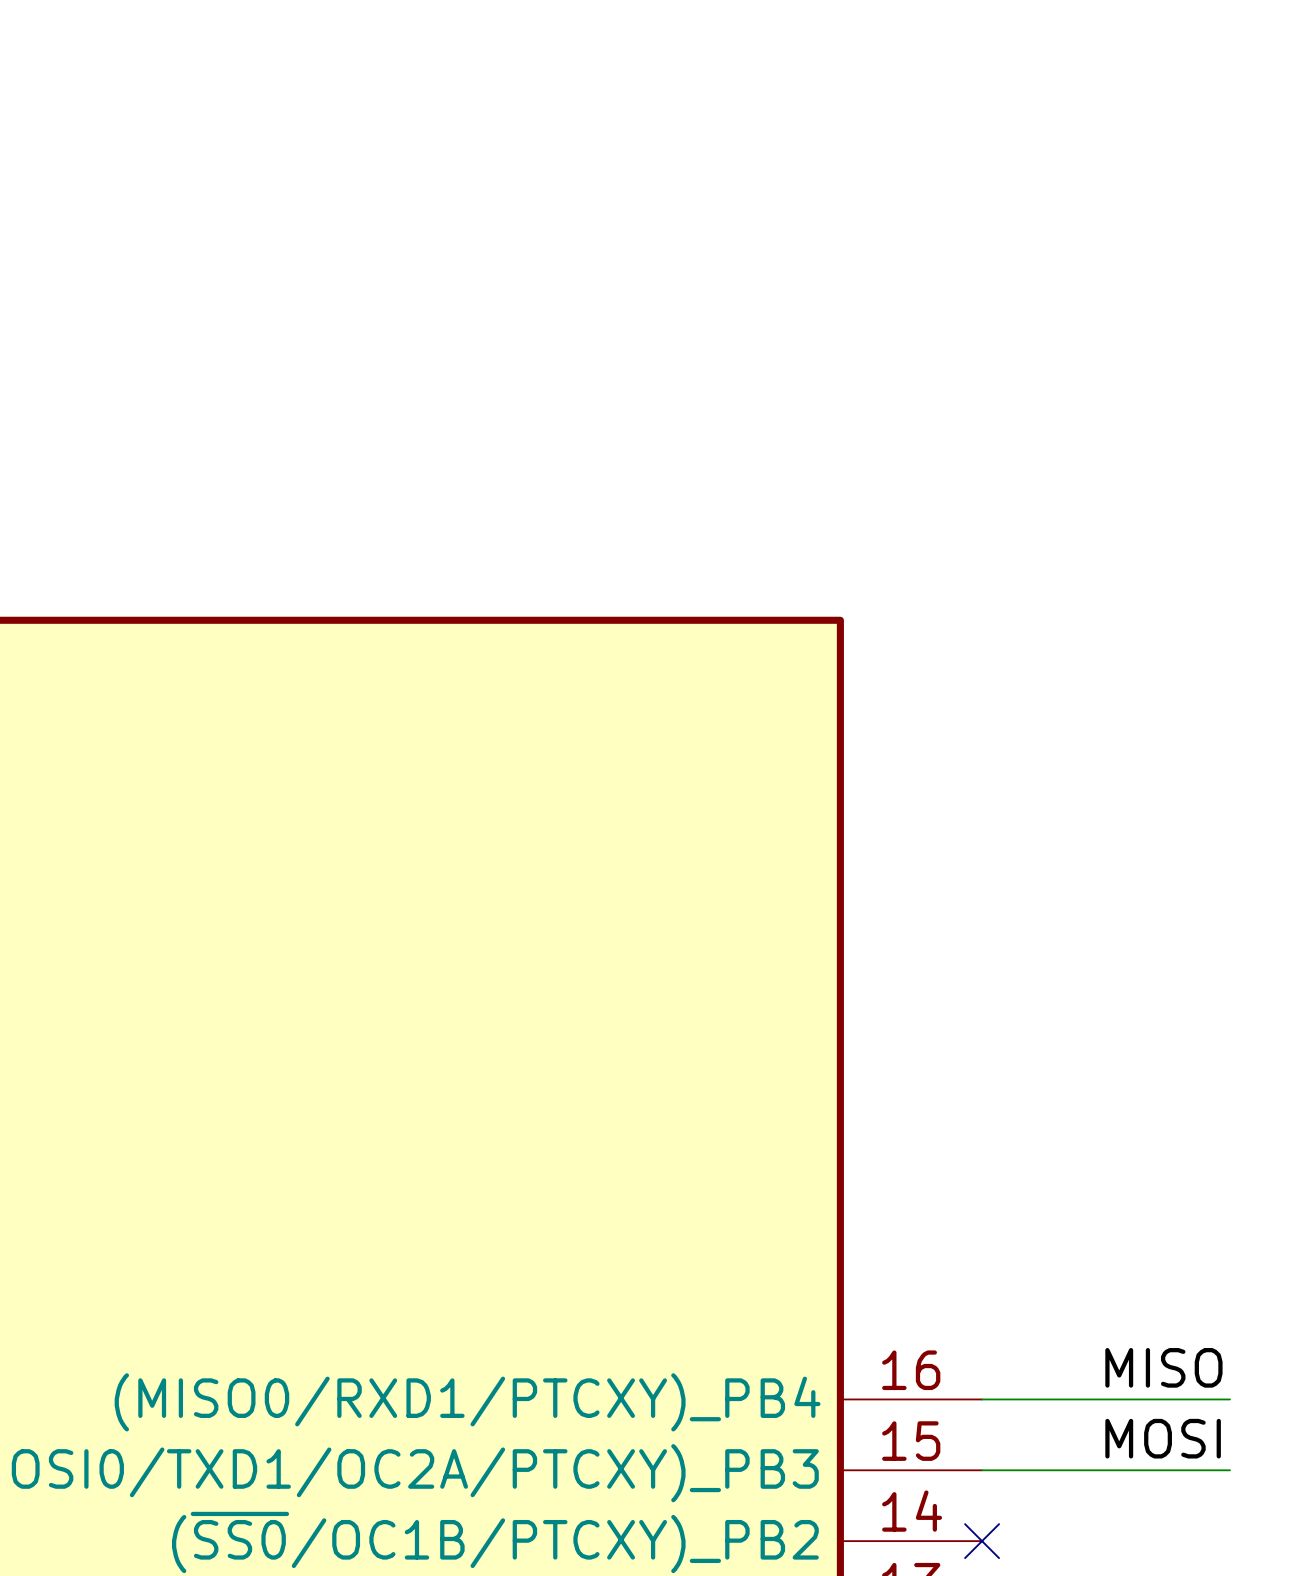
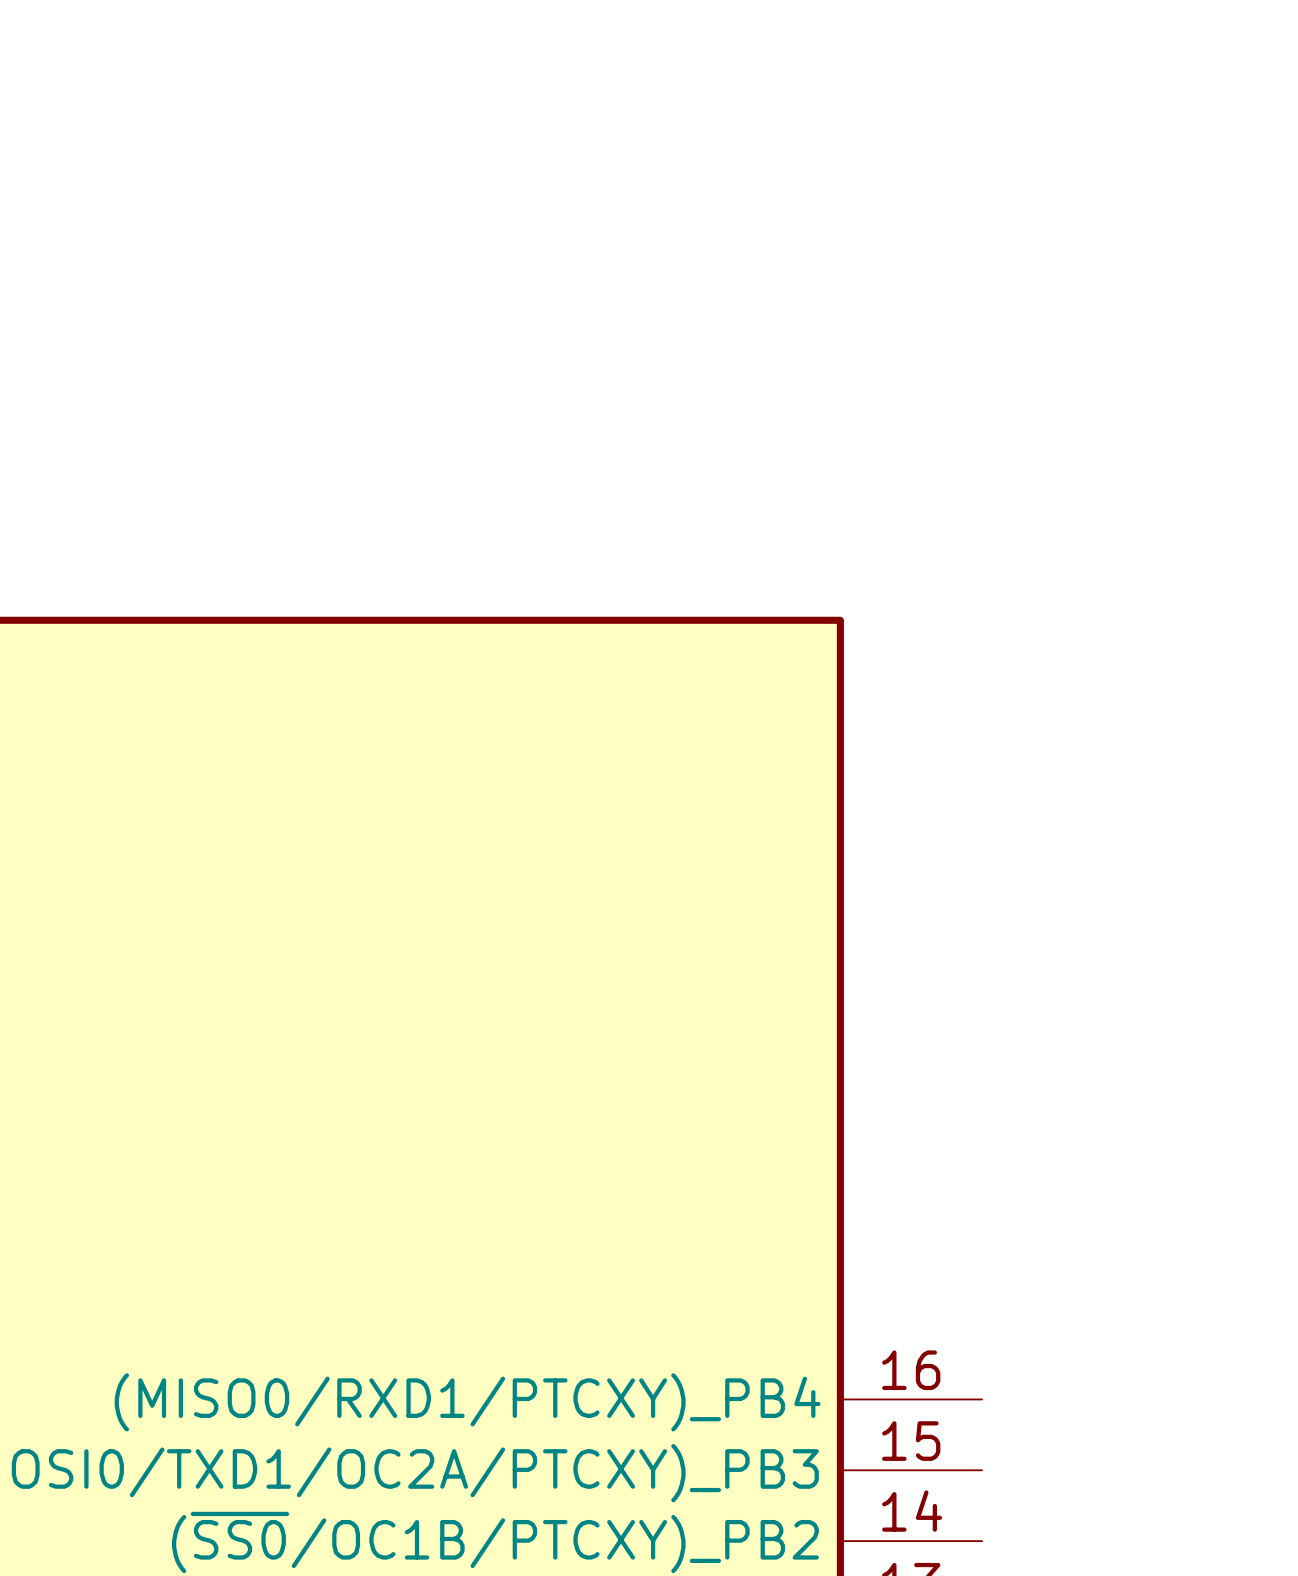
label: MISO (1163, 1367) -> none
wire: (982, 1399) (1229, 1399) -> none
label: MOSI (1163, 1438) -> none
wire: (982, 1470) (1229, 1470) -> none
no-connect mark: (982, 1541) -> none

